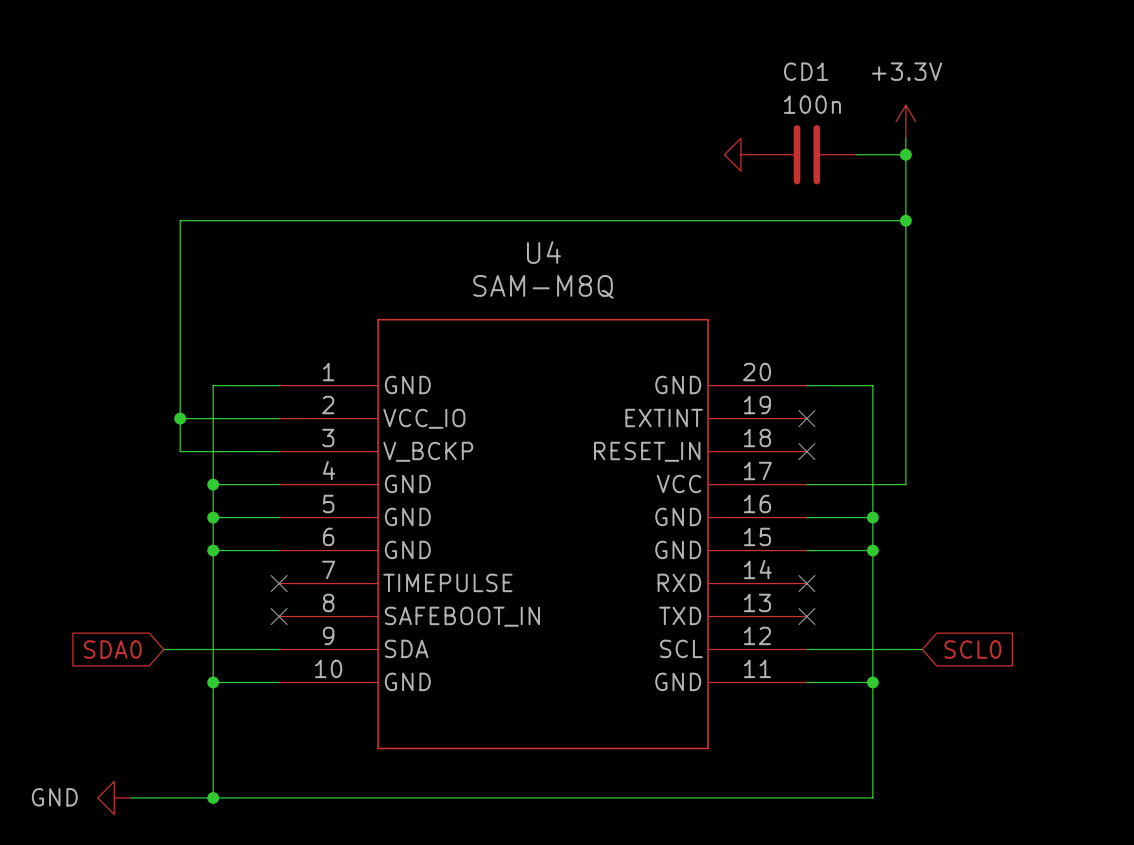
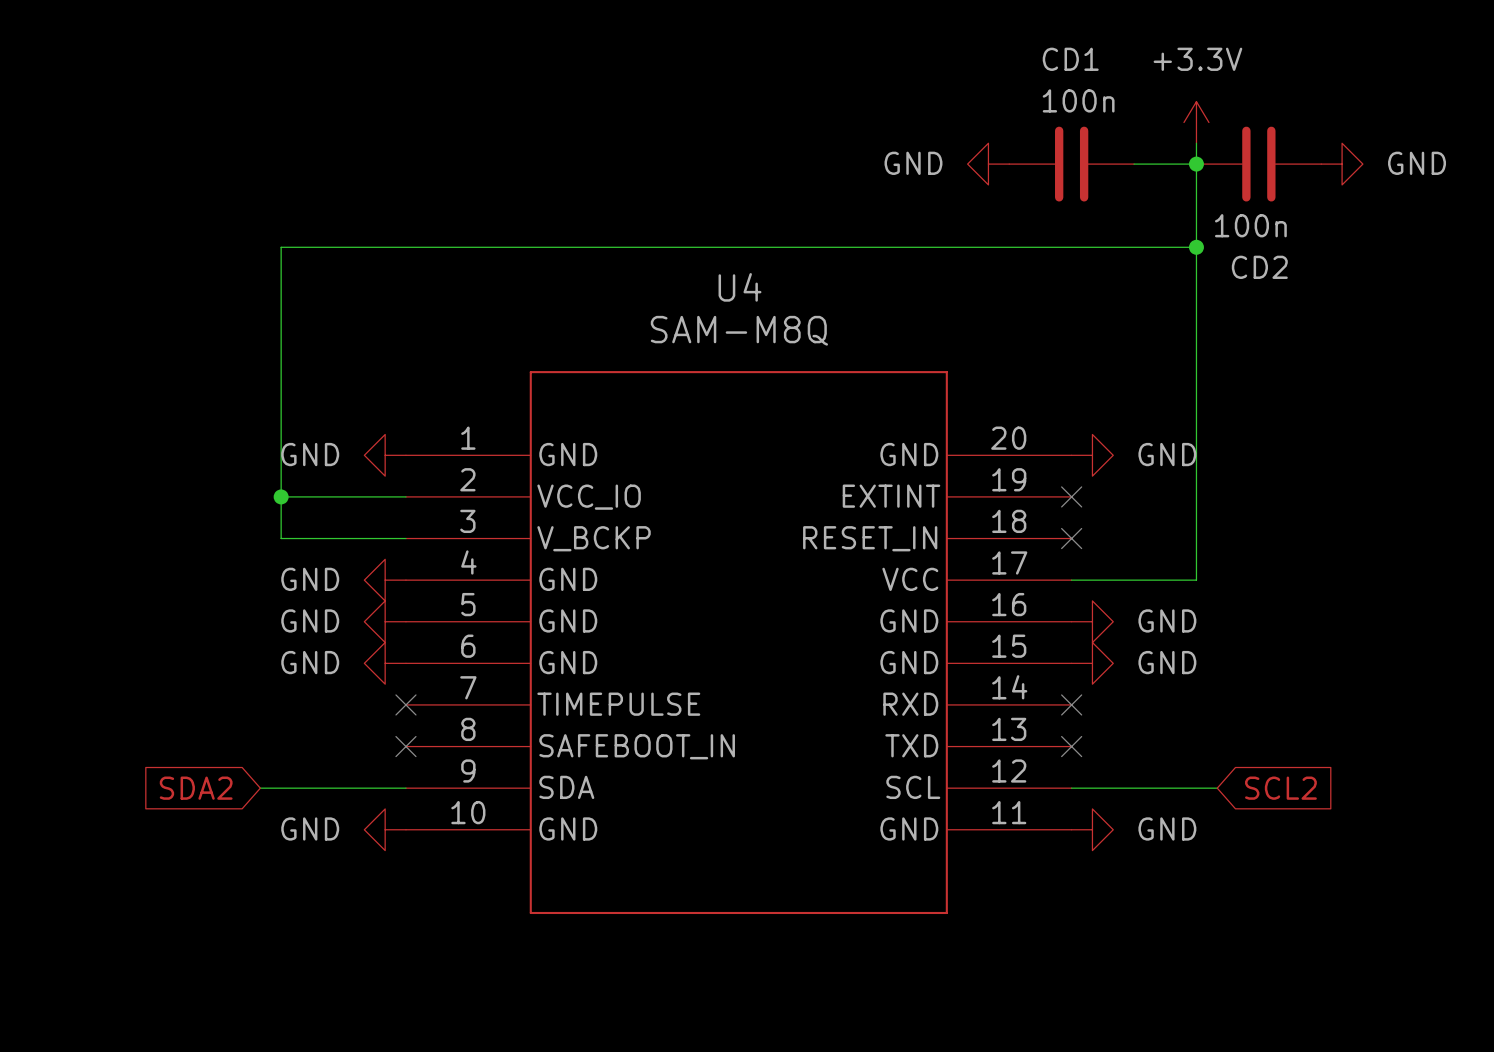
power symbol text: none -> GND (913, 163)
CD2: none -> 100n (1258, 164)
power symbol: none -> GND (1342, 164)
power symbol: none -> GND (385, 455)
wire: (279, 385) (213, 385) (213, 797) -> none
wire: (806, 385) (872, 385) (872, 797) (130, 797) -> none
power symbol: none -> GND (1092, 455)
wire: (213, 484) (279, 484) -> none
junction: (213, 484) -> none
power symbol: none -> GND (385, 580)
wire: (213, 517) (279, 517) -> none
junction: (213, 517) -> none
power symbol: none -> GND (385, 621)
wire: (806, 517) (872, 517) -> none
power symbol: none -> GND (1092, 621)
junction: (872, 517) -> none
wire: (213, 550) (279, 550) -> none
junction: (213, 550) -> none
power symbol: none -> GND (385, 663)
wire: (806, 550) (872, 550) -> none
power symbol: none -> GND (1092, 663)
junction: (872, 550) -> none
global label: SDA0 (112, 649) -> SDA2 (196, 788)
global label: SCL0 (972, 649) -> SCL2 (1280, 788)
wire: (213, 682) (279, 682) -> none
junction: (213, 682) -> none
power symbol: none -> GND (385, 829)
wire: (806, 682) (872, 682) -> none
power symbol: none -> GND (1092, 829)
junction: (872, 682) -> none
power symbol: GND (114, 797) -> none
junction: (213, 797) -> none

